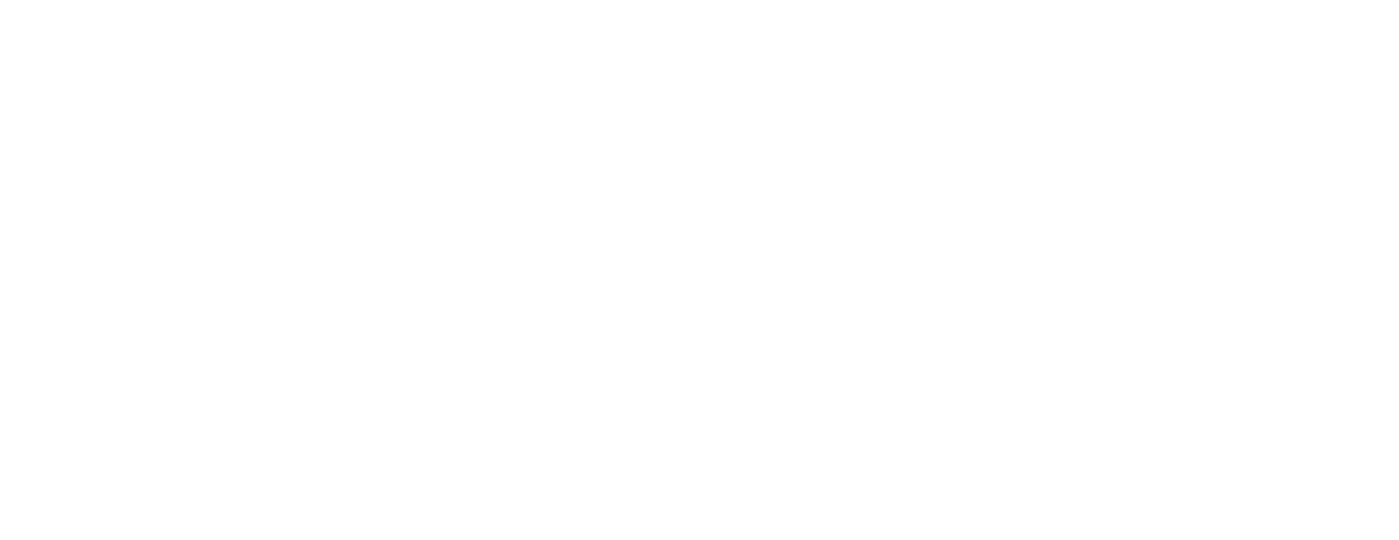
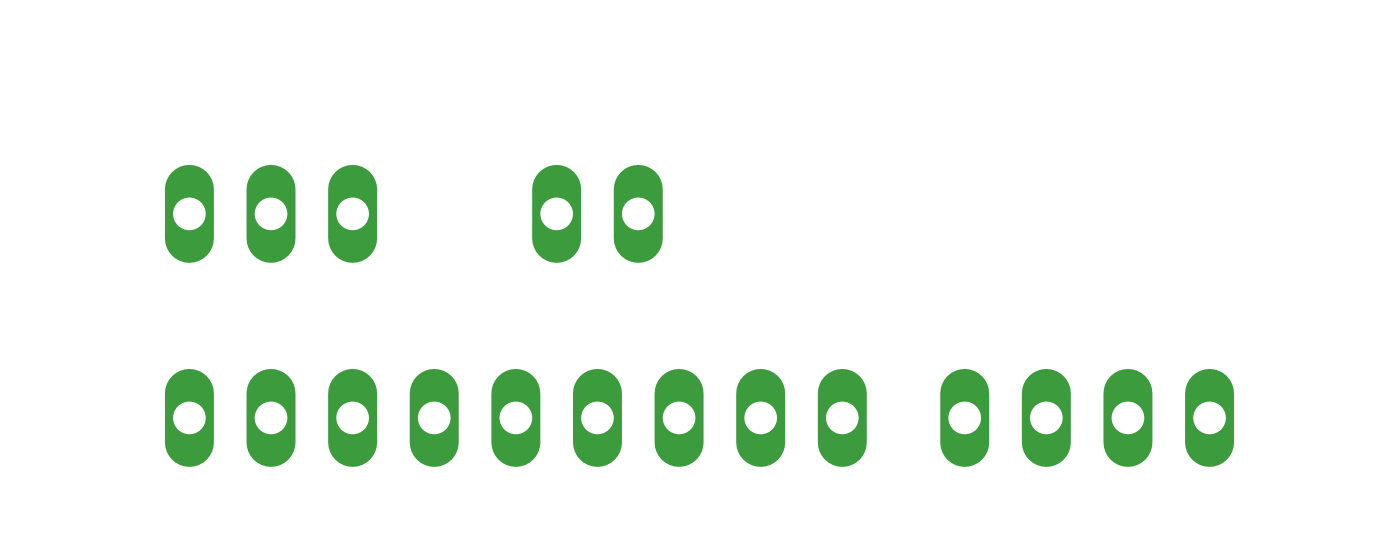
part: none -> (271, 213)
part: none -> (597, 213)
part: none -> (515, 417)
part: none -> (1087, 417)

